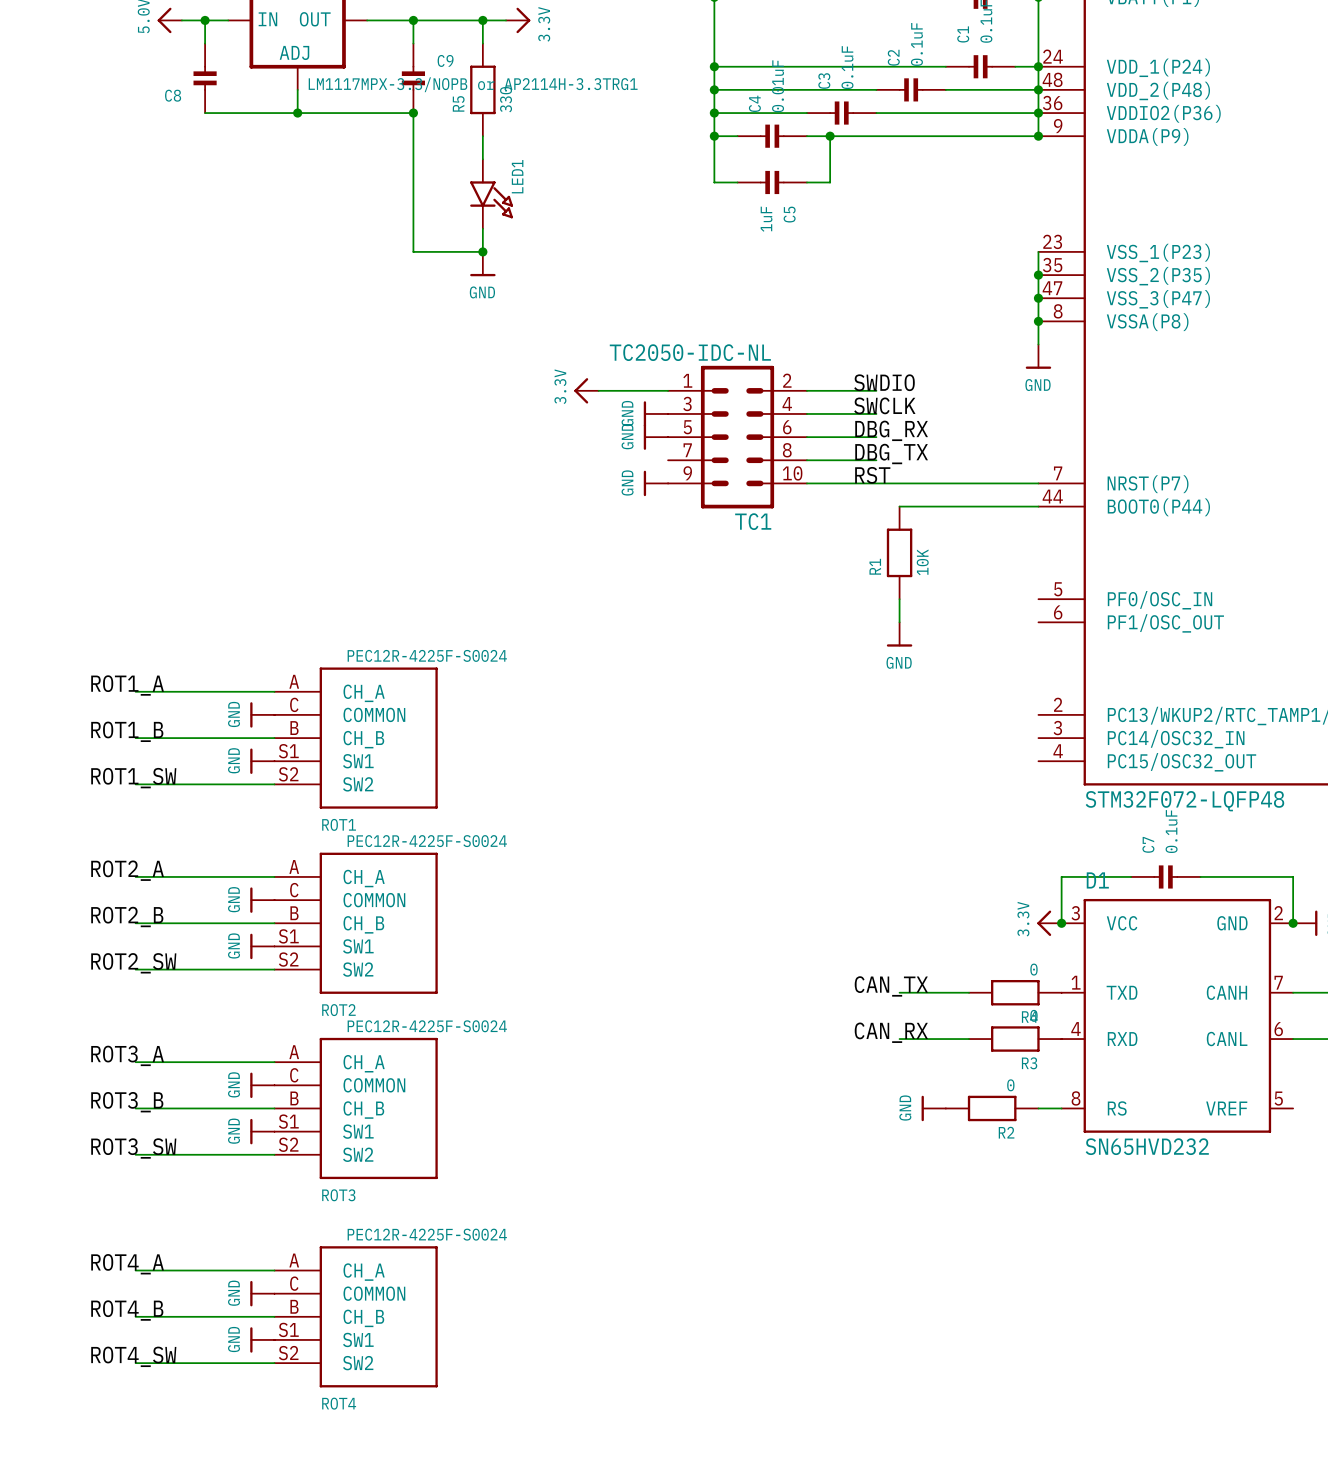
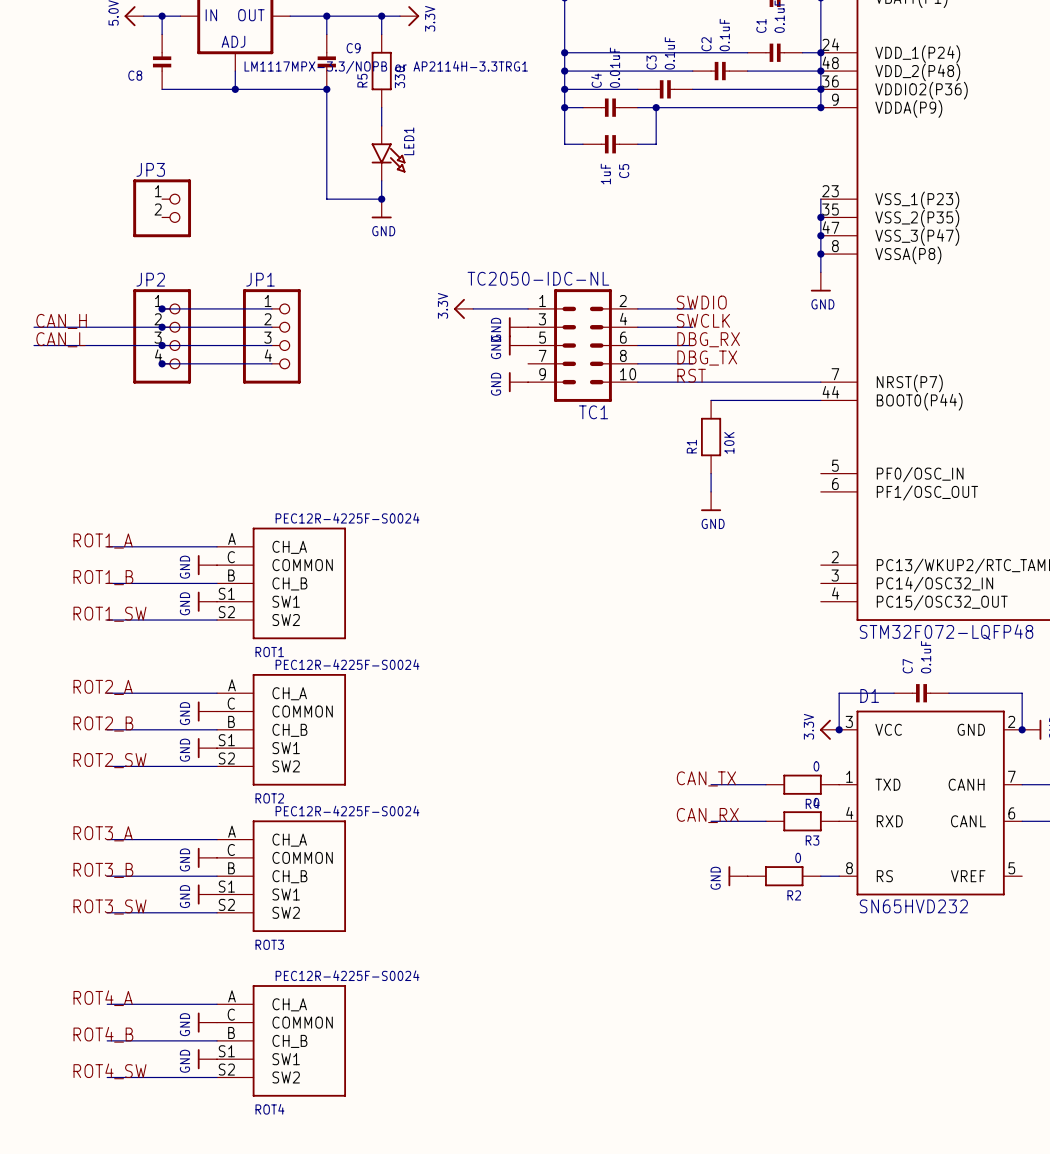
JP3: none -> (162, 208)
wire: none -> (162, 308) (271, 308)
junction: none -> (162, 308)
label: none -> CAN_H (61, 321)
wire: none -> (34, 327) (271, 327)
junction: none -> (162, 327)
JP2: none -> (162, 336)
JP1: none -> (271, 336)
label: none -> CAN_L (61, 339)
wire: none -> (34, 345) (271, 345)
junction: none -> (162, 345)
wire: none -> (162, 363) (271, 363)
junction: none -> (162, 363)

